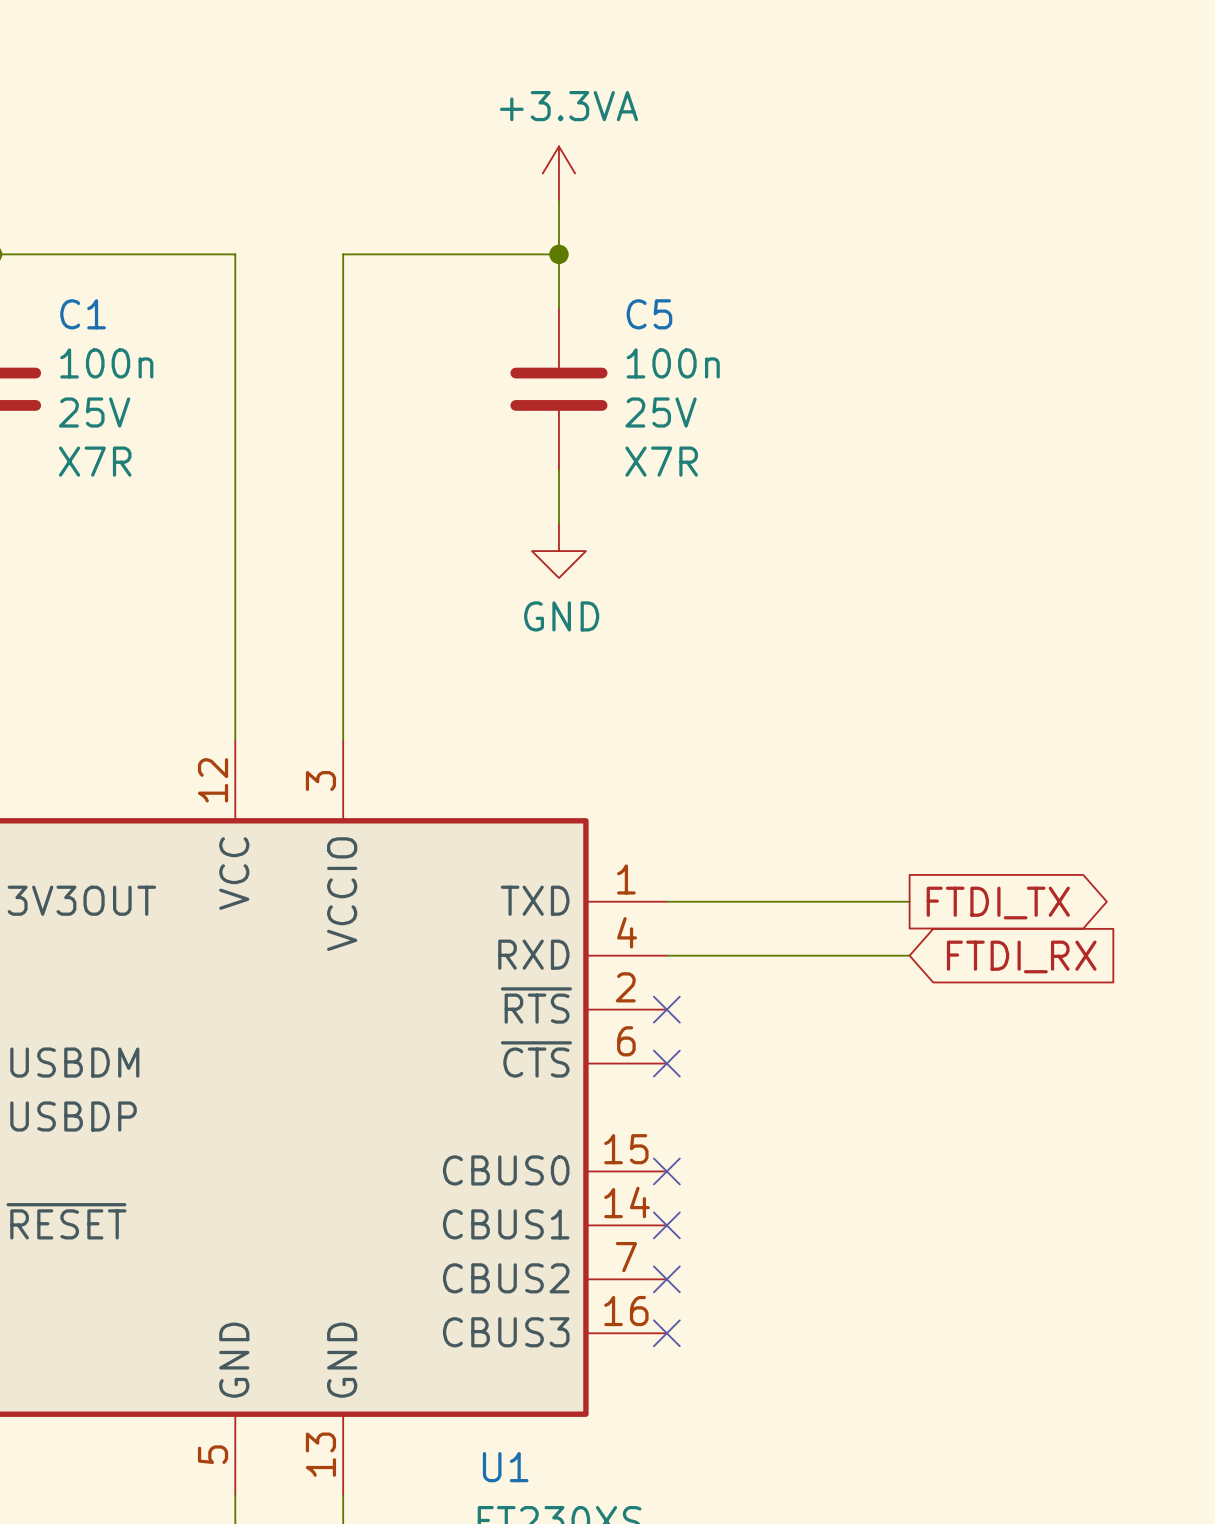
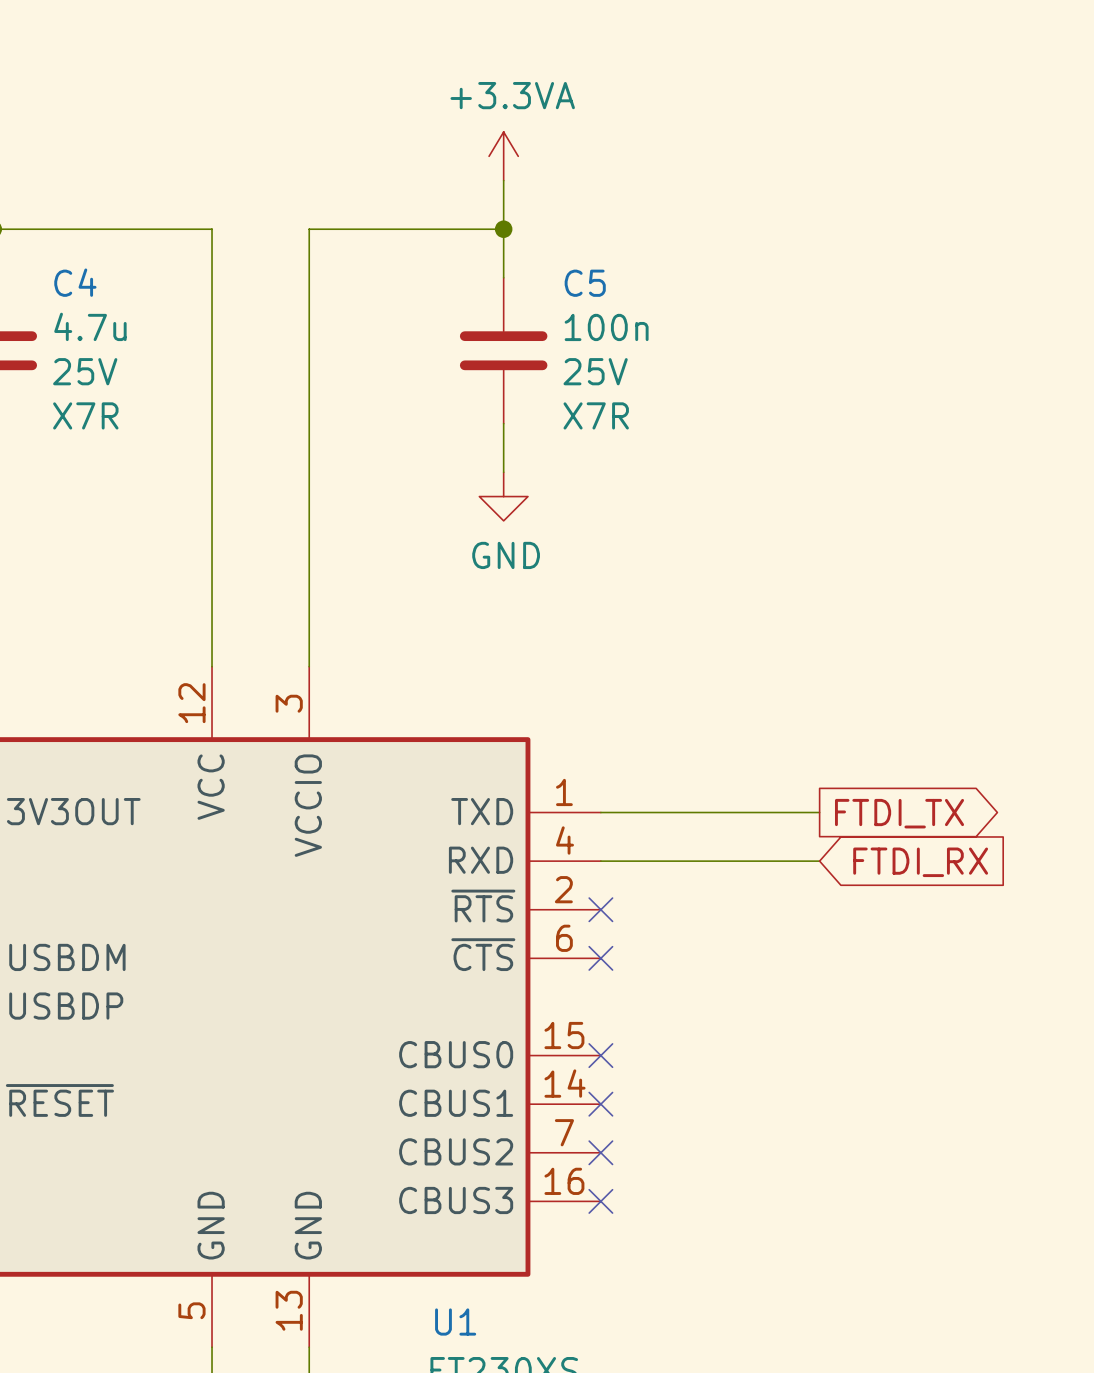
C1 name: C1 (83, 314) -> C4 (75, 282)
C1 value: 100n (106, 363) -> 4.7u (90, 326)

